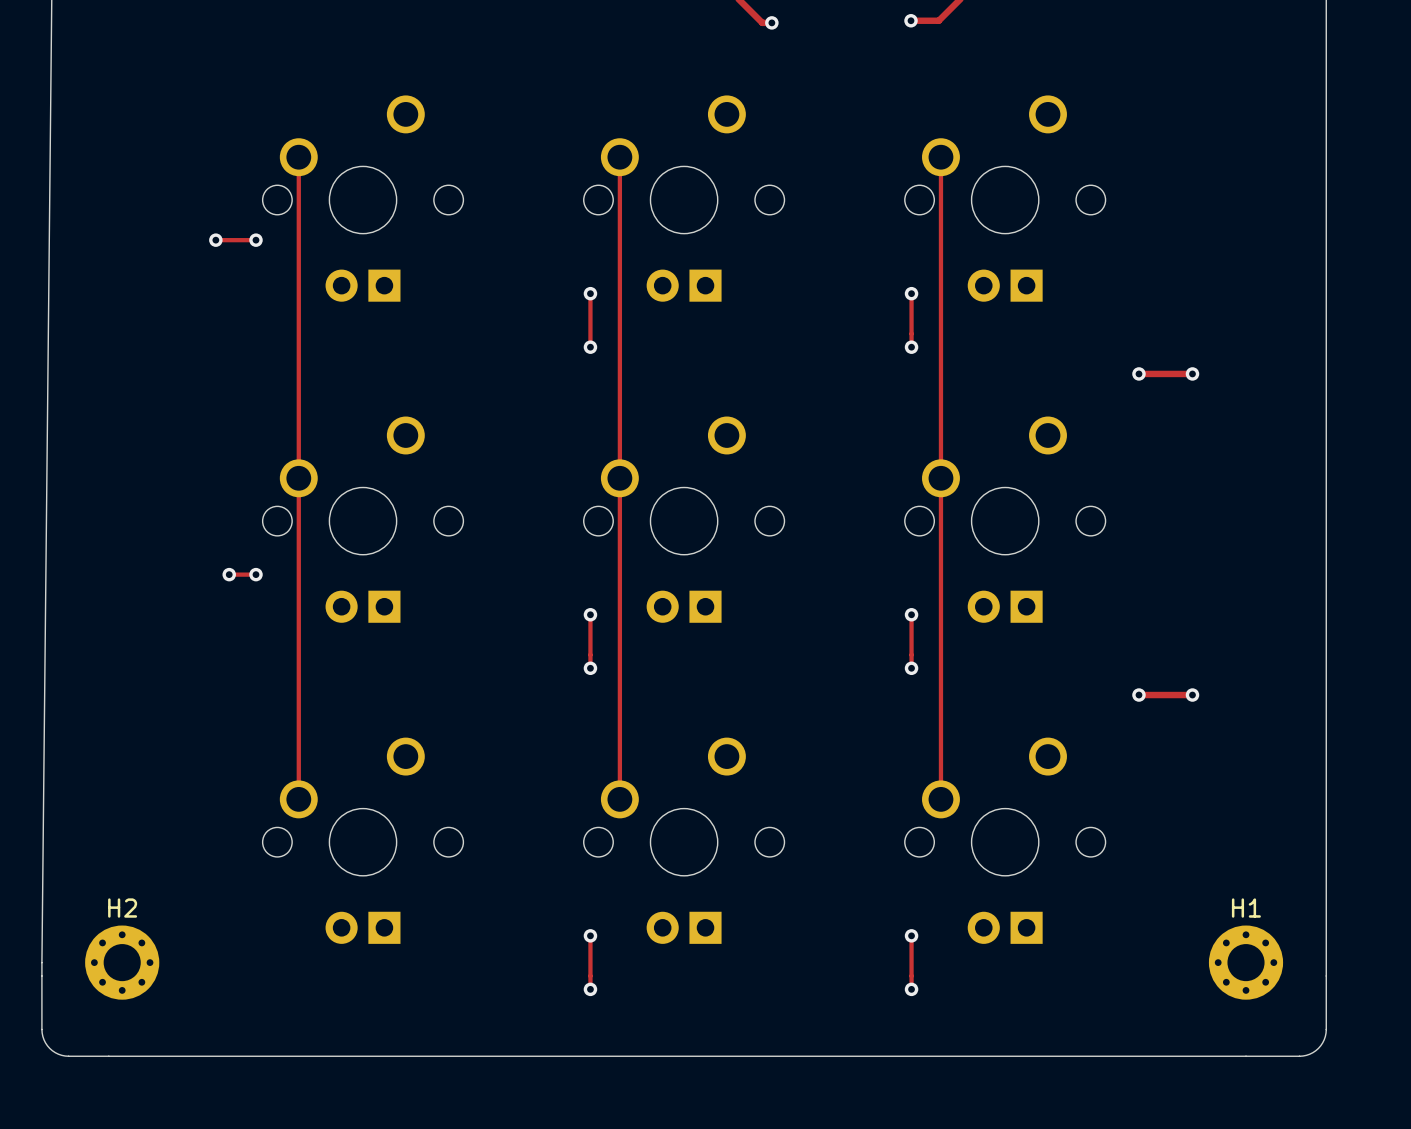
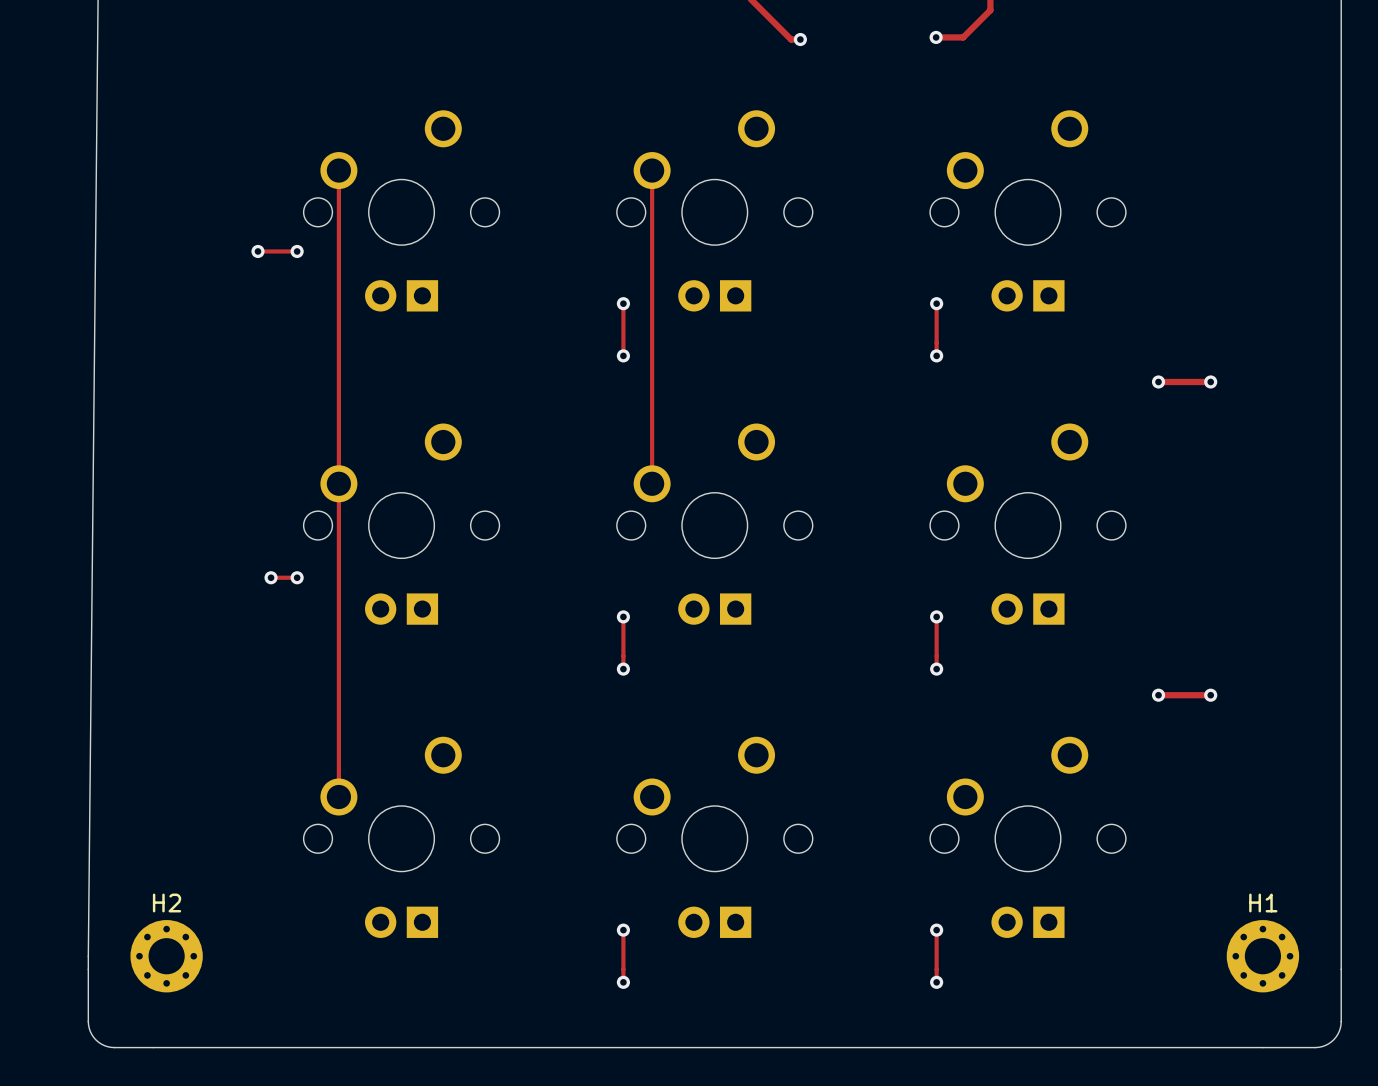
track: (940, 157) (940, 799) -> none
track: (619, 464) (619, 799) -> none

